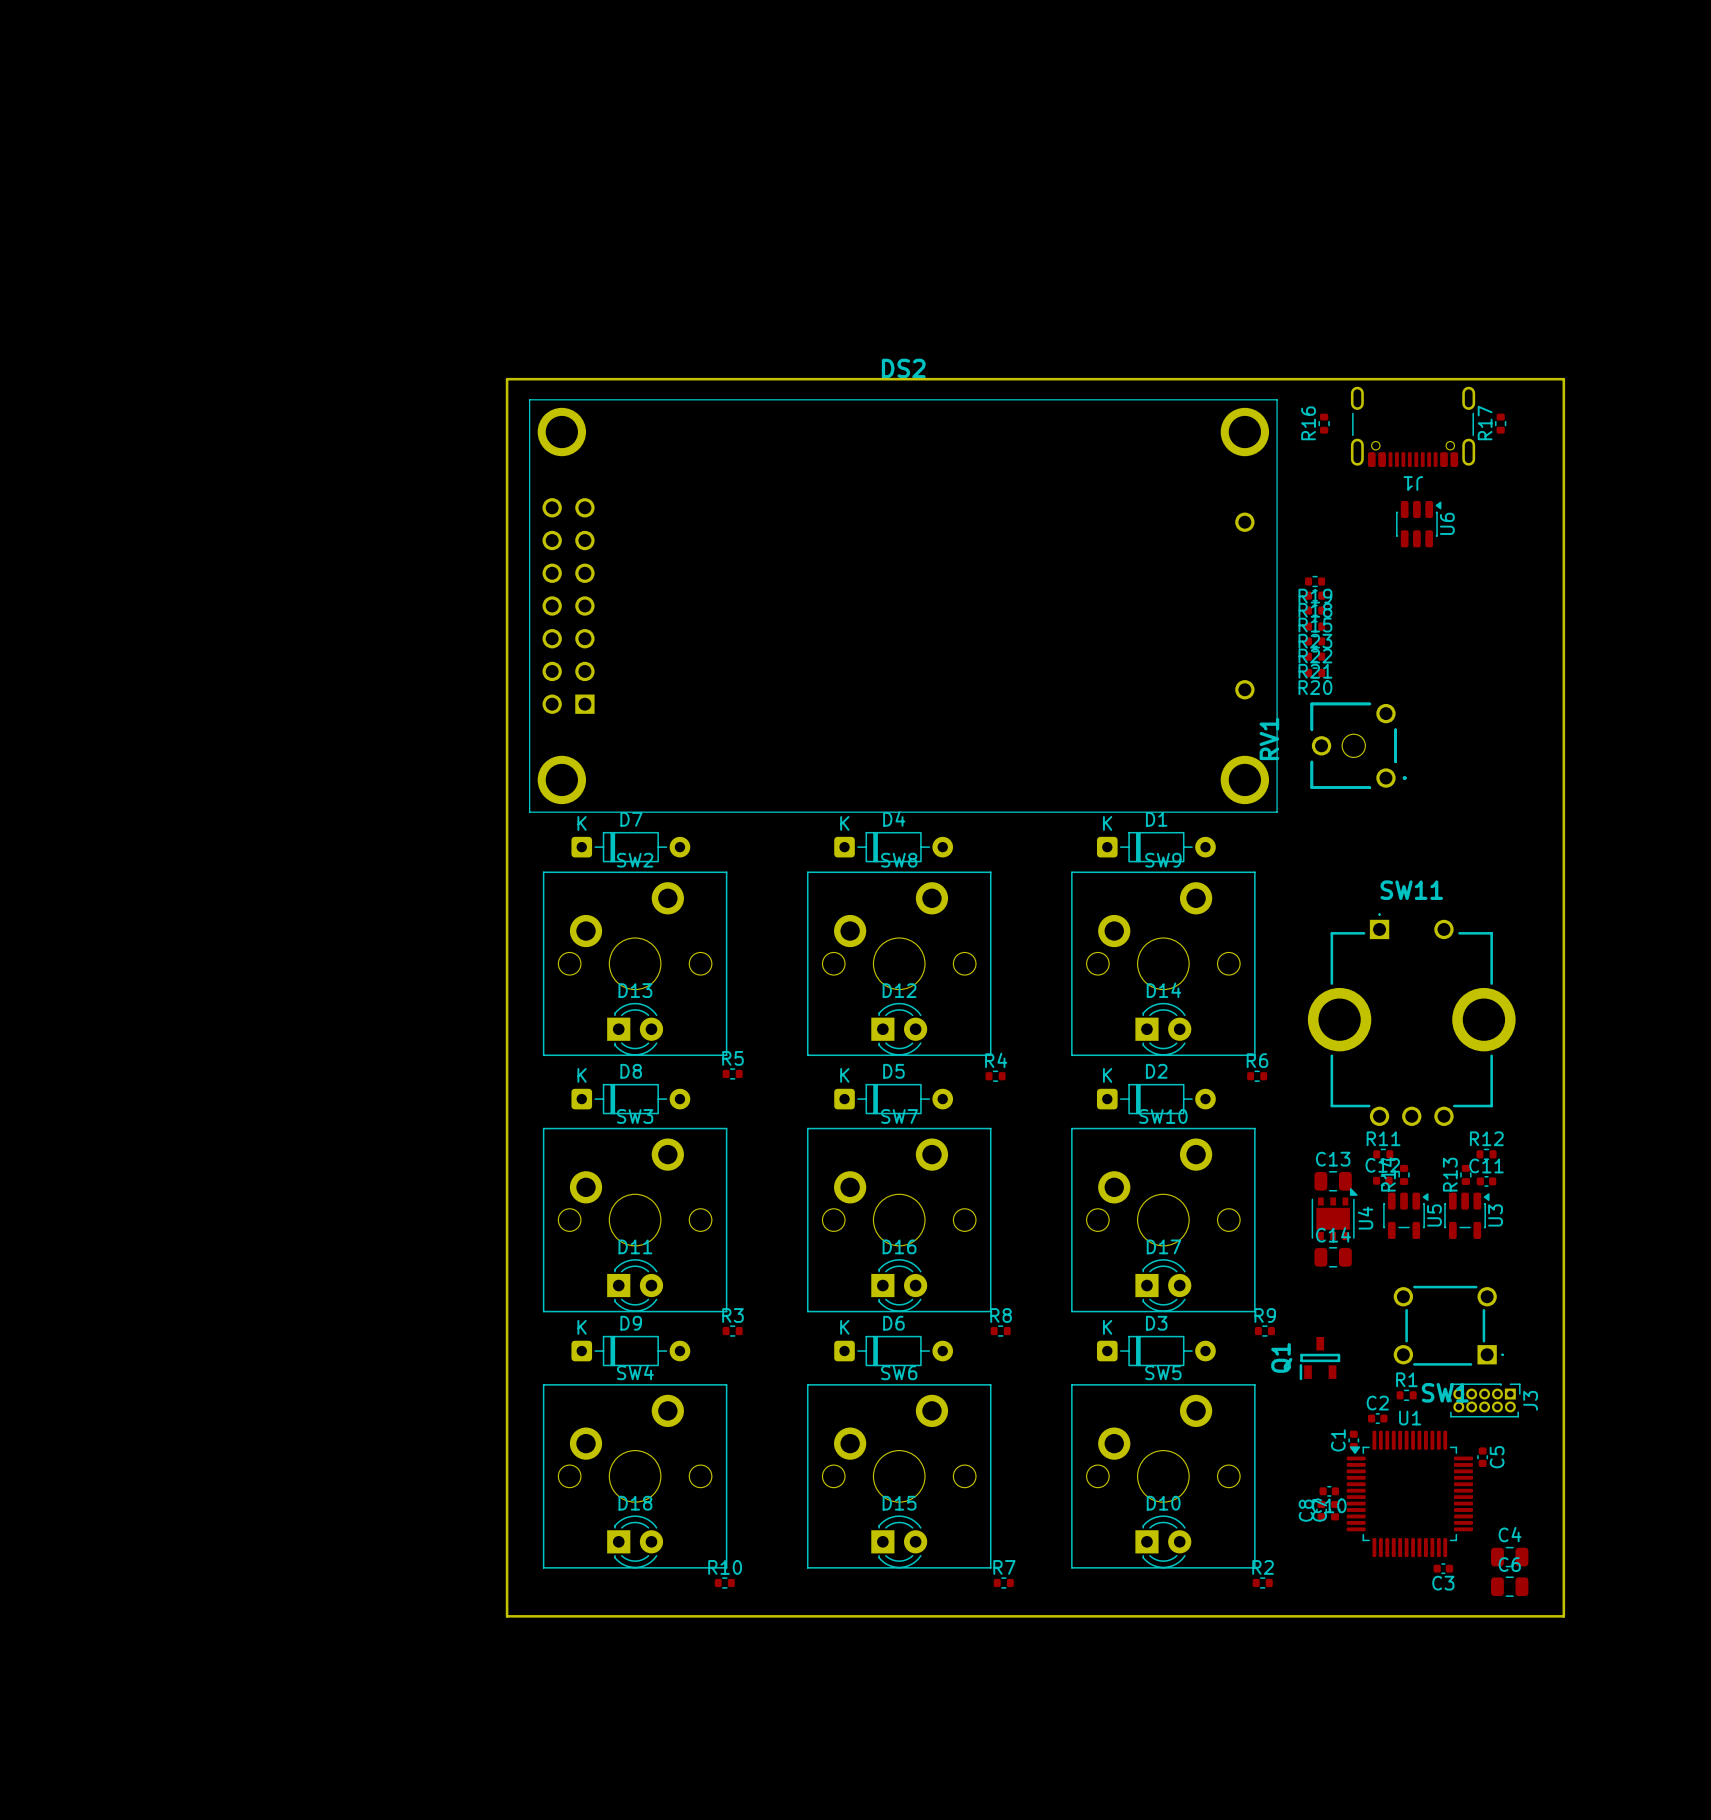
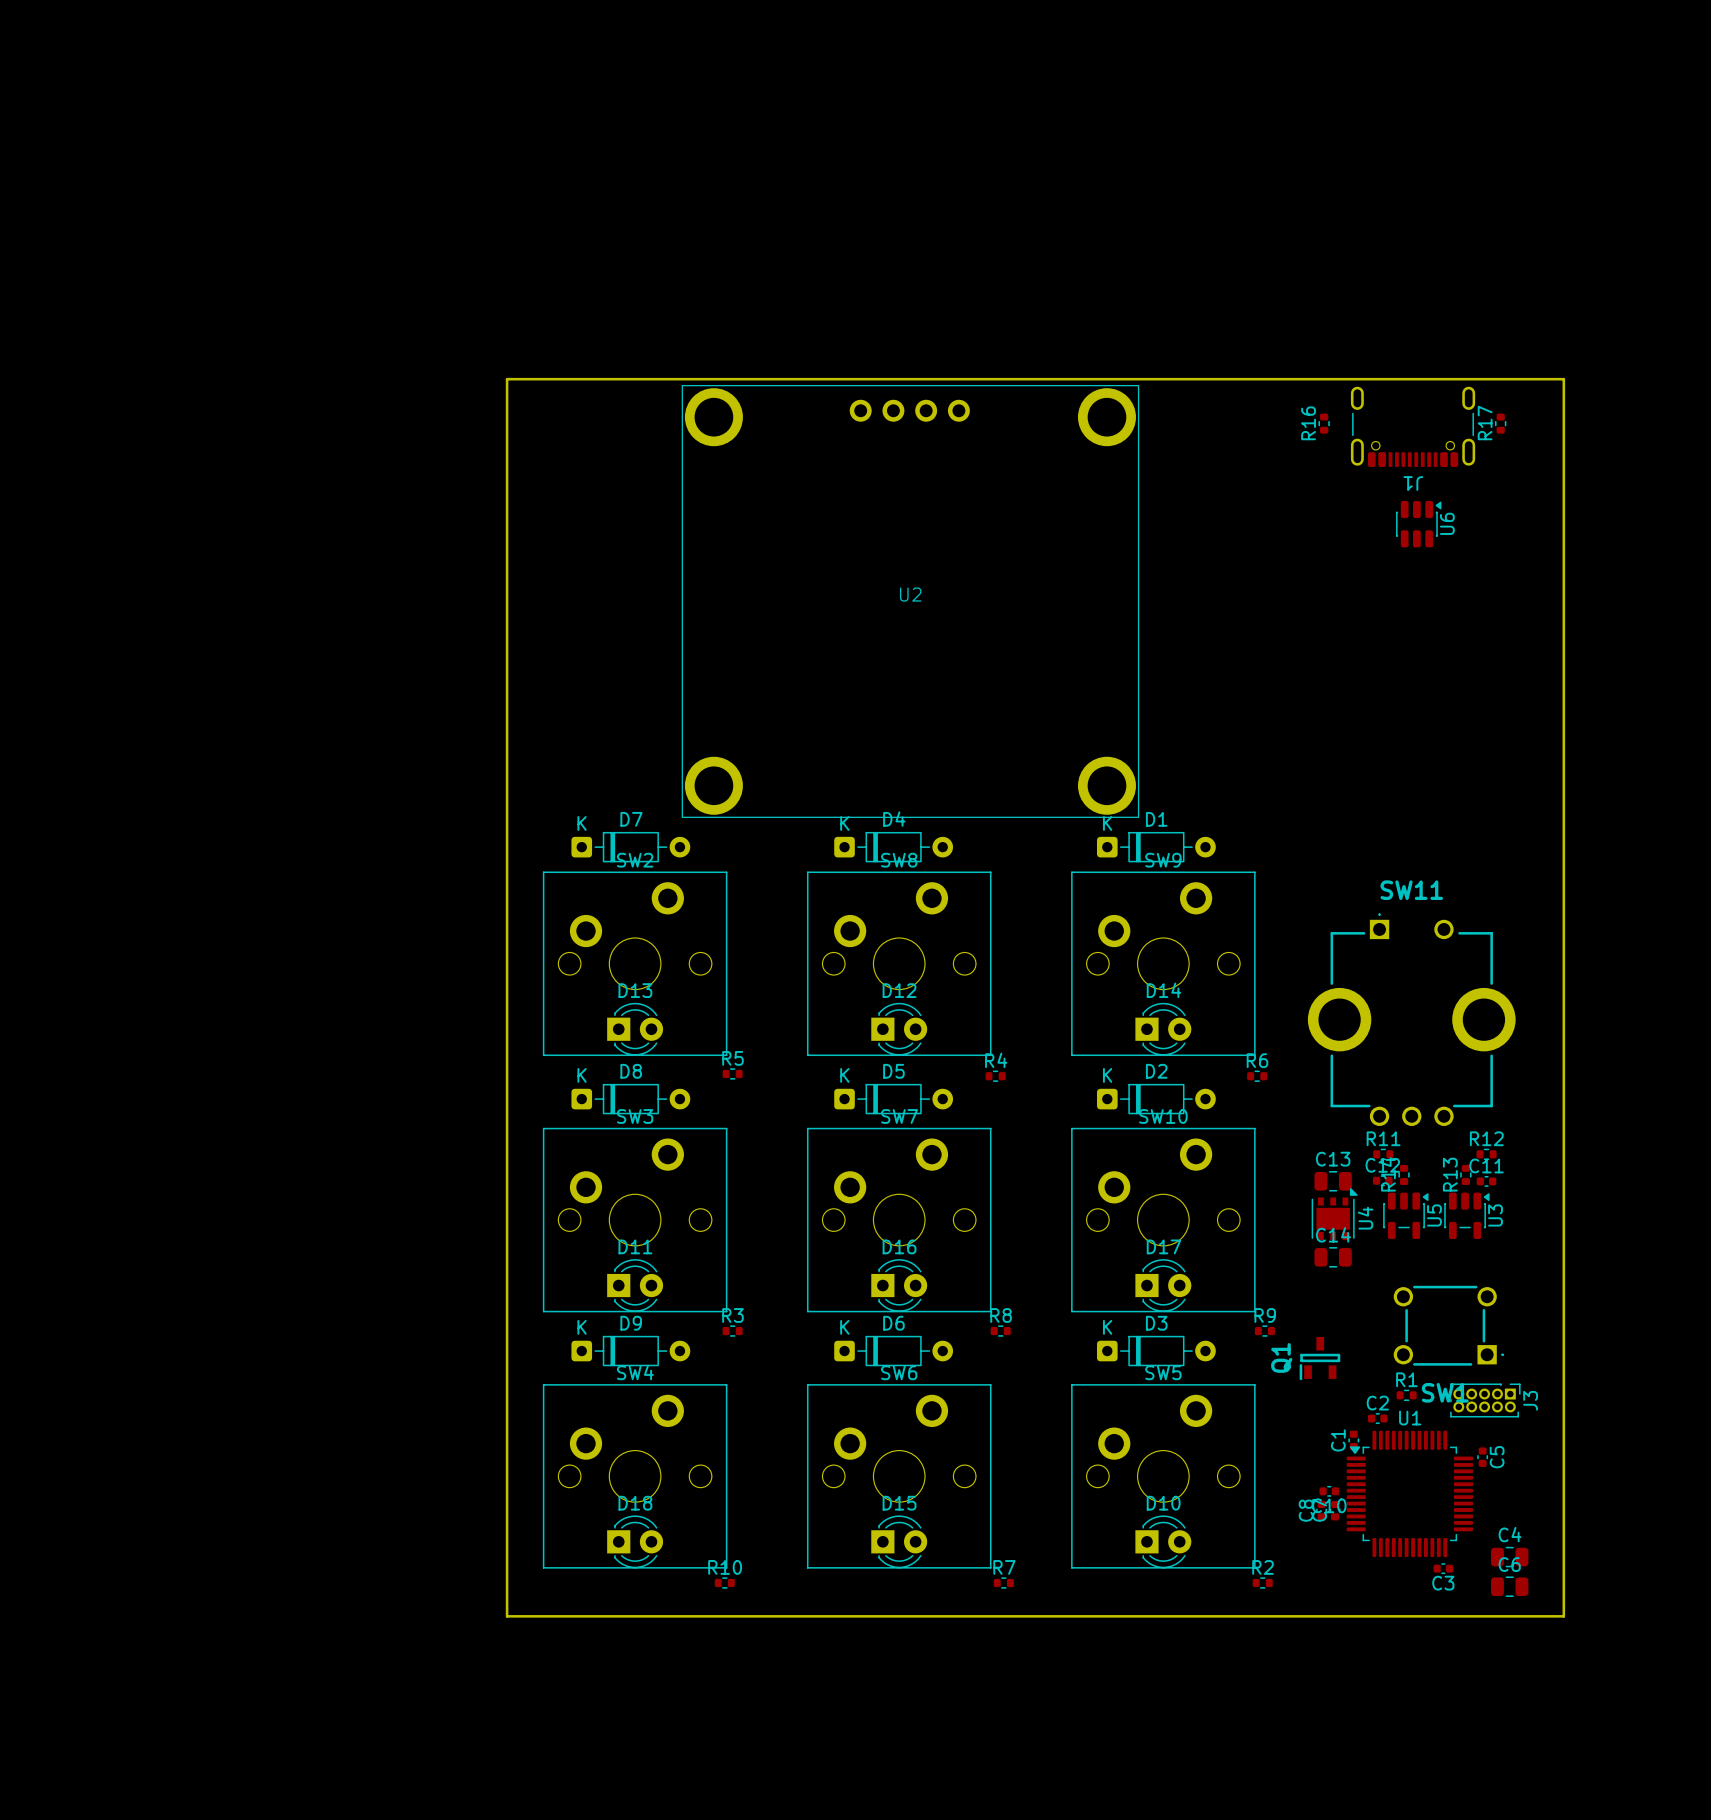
R19: (1315, 581) -> none
R18: (1315, 595) -> none
U2: none -> (910, 601)
DS2: (903, 605) -> none
R15: (1315, 610) -> none
R23: (1315, 626) -> none
R22: (1315, 641) -> none
R21: (1315, 656) -> none
R20: (1315, 673) -> none
RV1: (1358, 745) -> none

